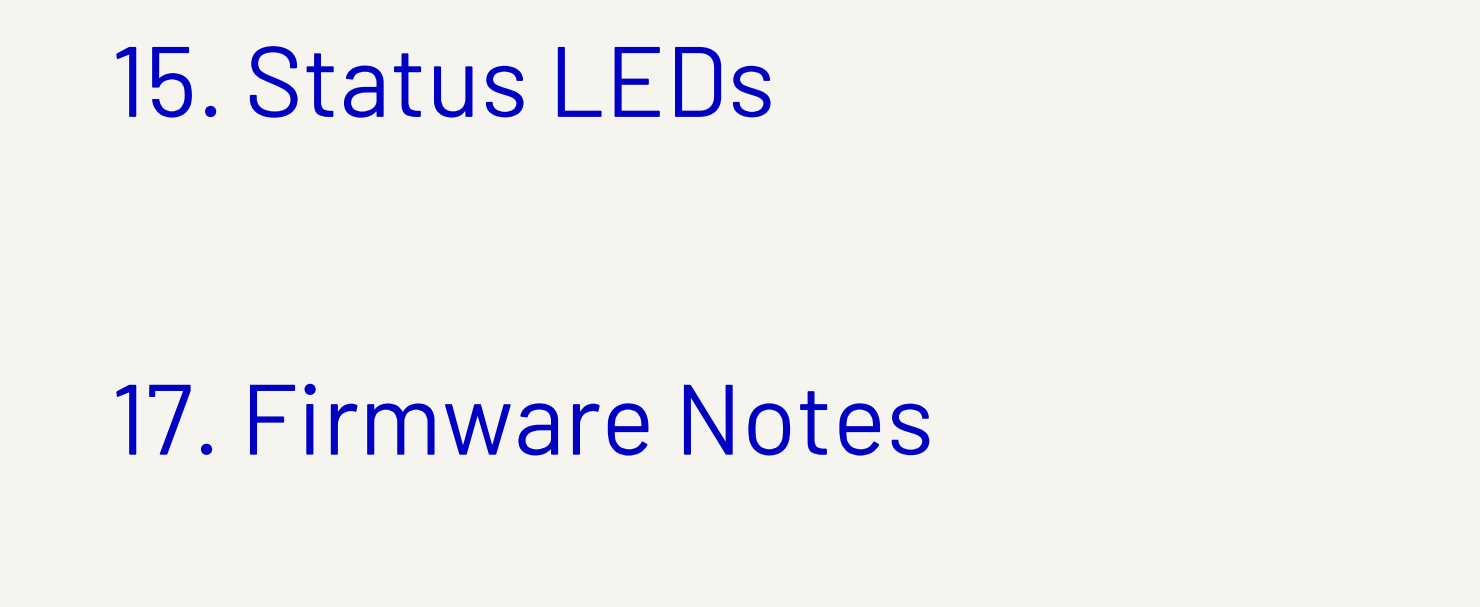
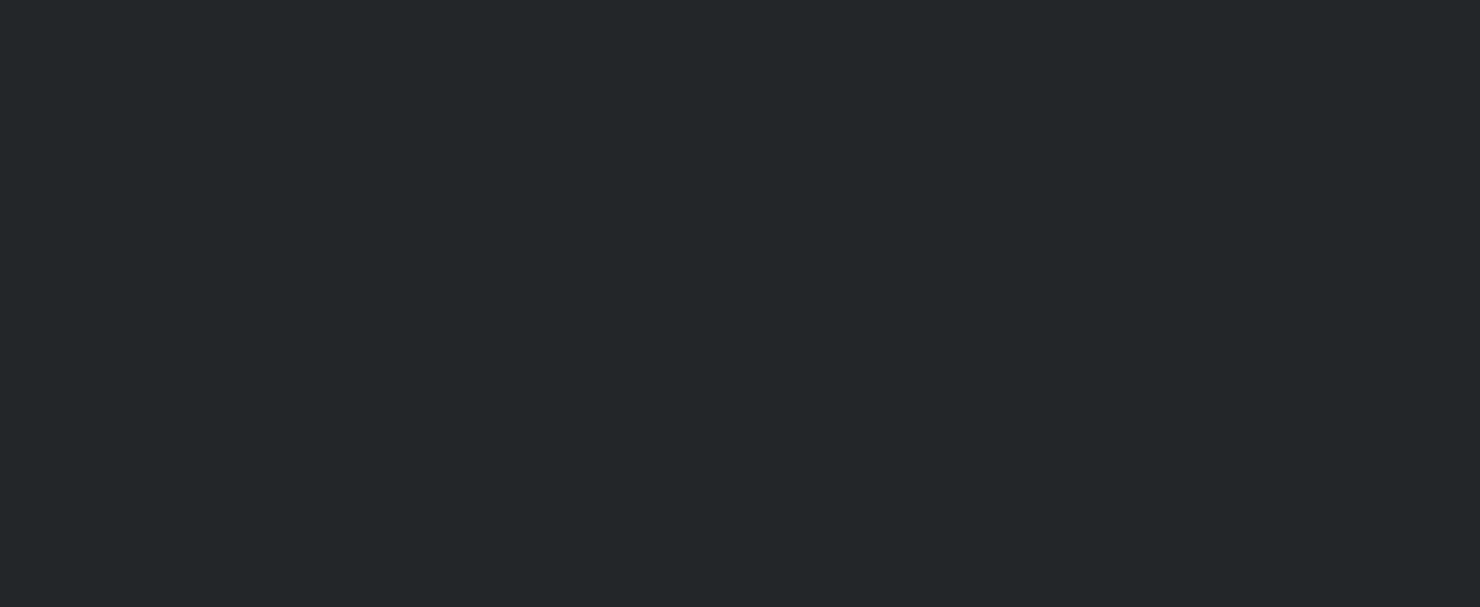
text: 15. Status LEDs (443, 81) -> none
text: 17. Firmware Notes (522, 419) -> none

